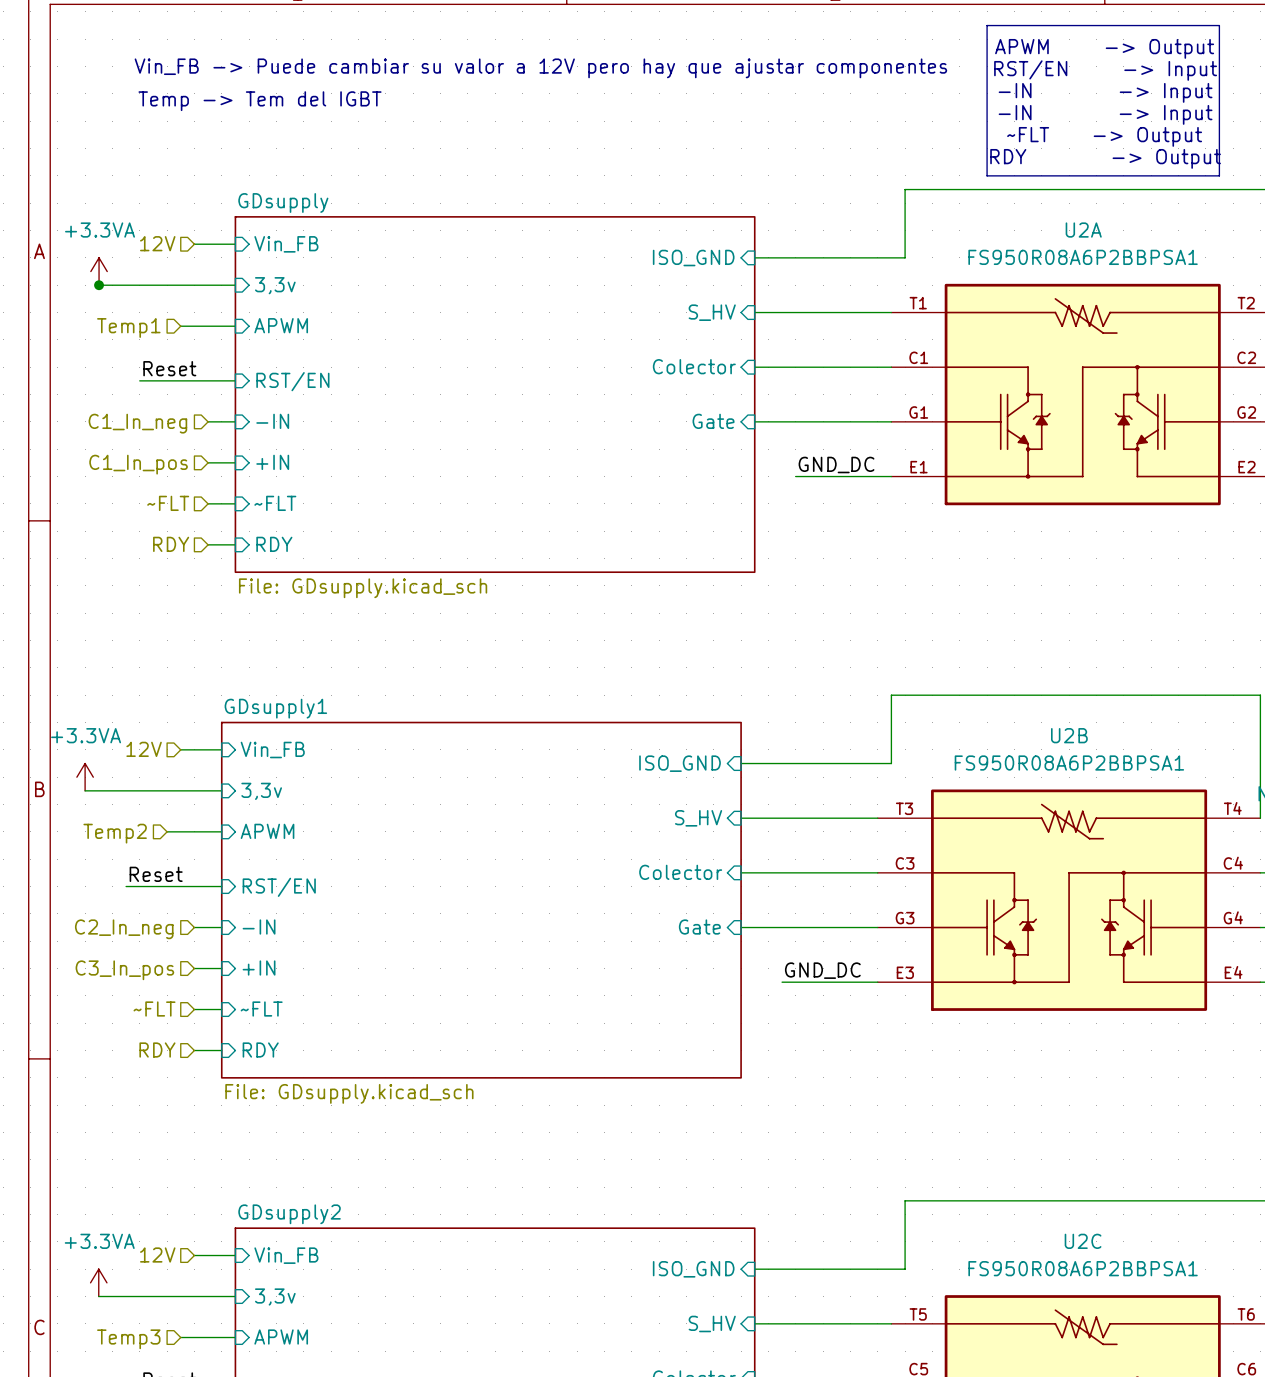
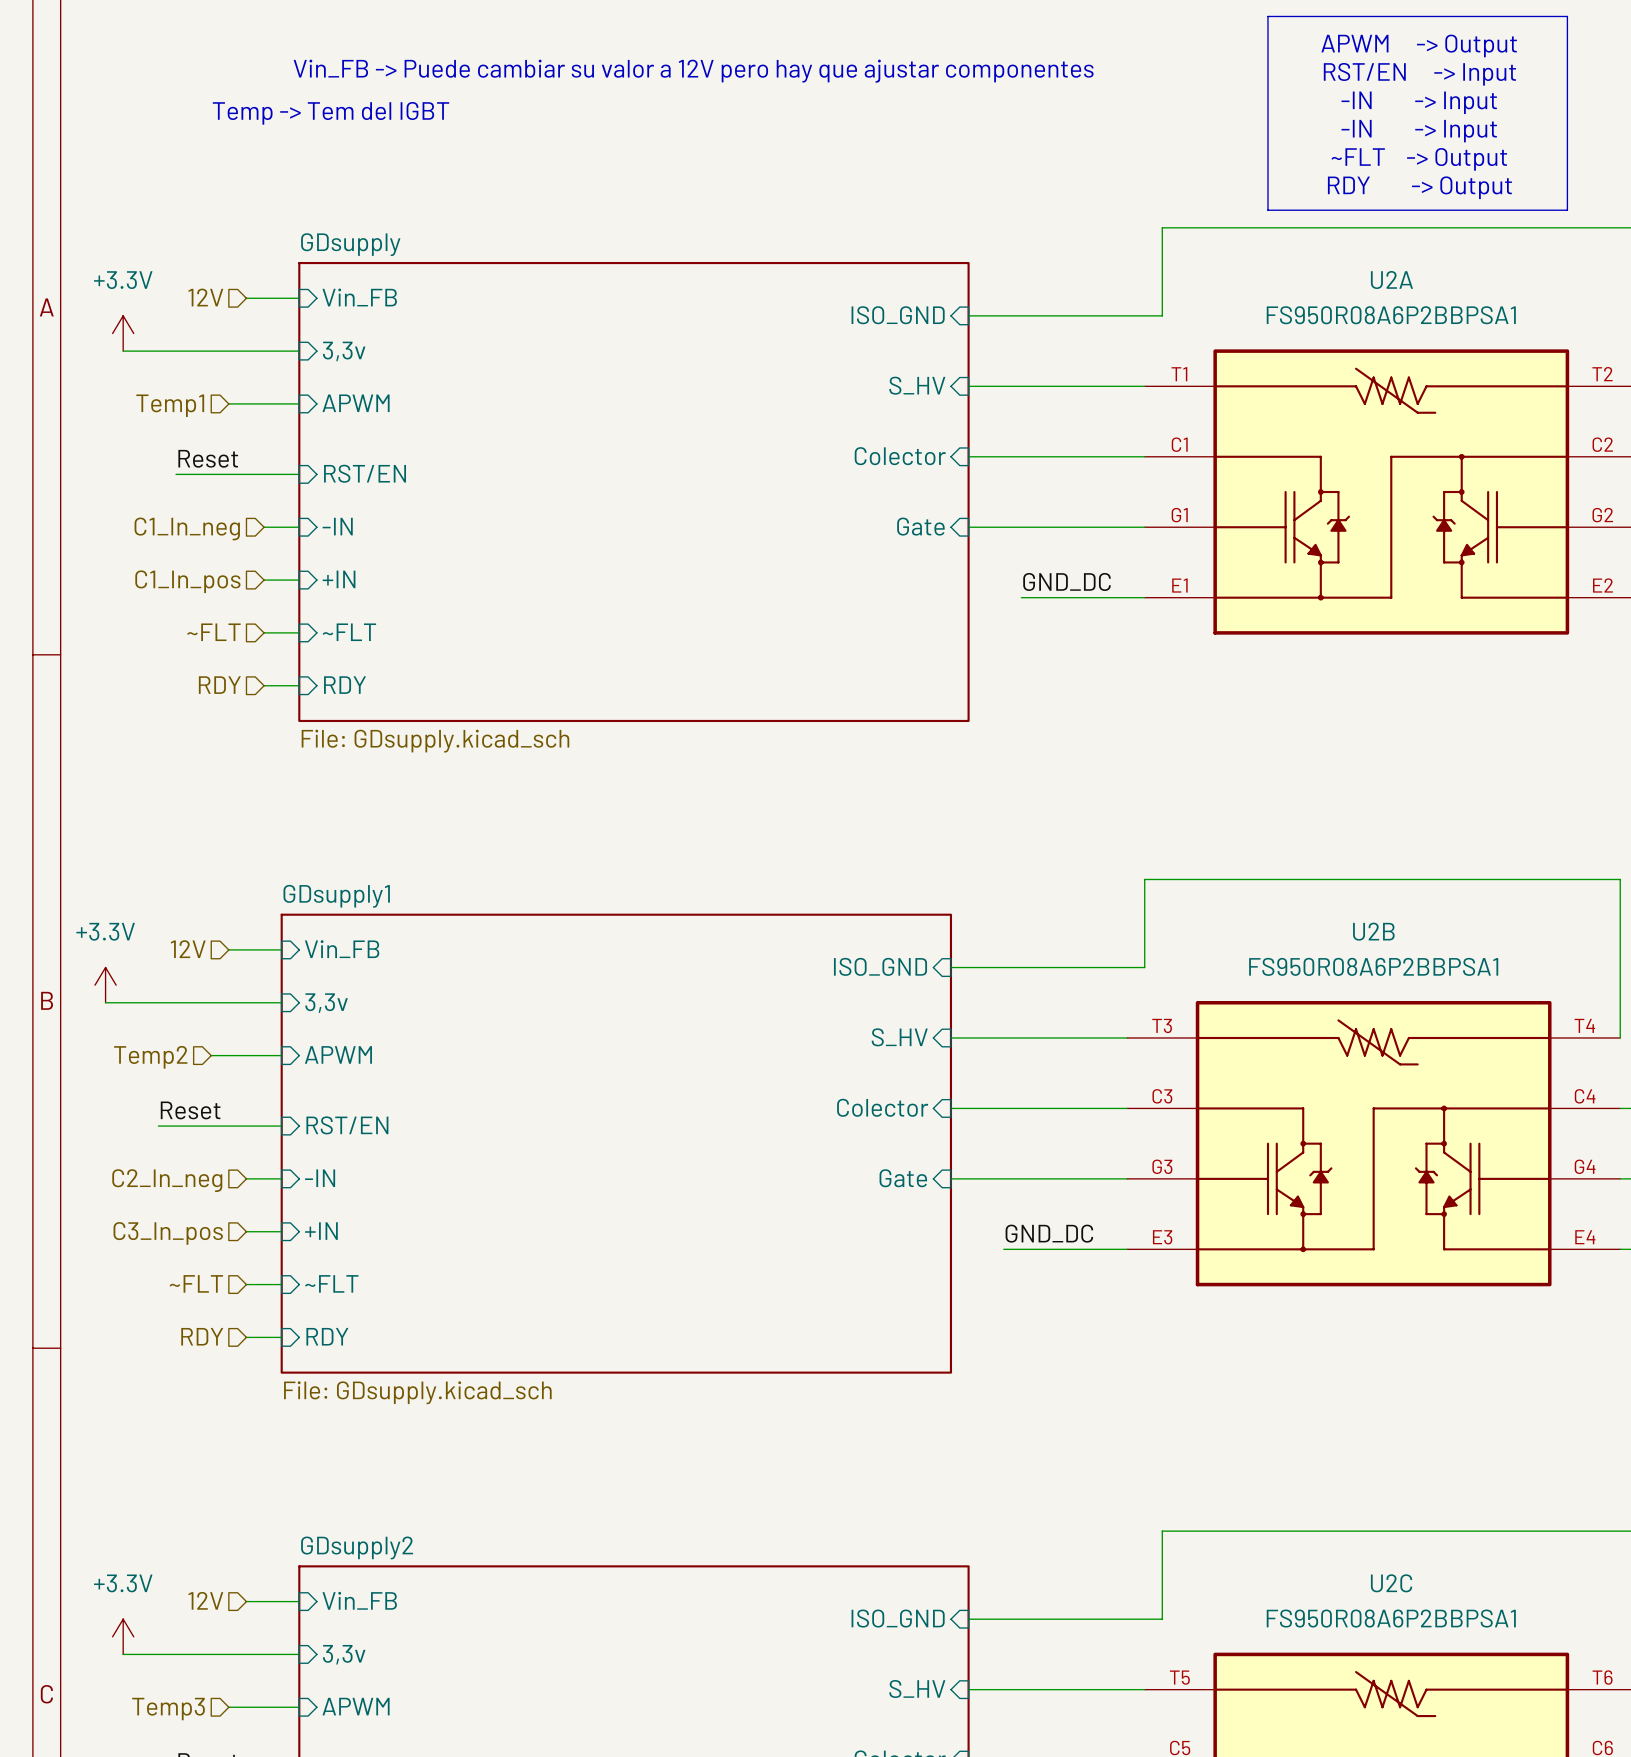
power symbol: +3.3VA (99, 271) -> +3.3V (123, 333)
junction: (99, 285) -> none
power symbol: +3.3VA (85, 777) -> +3.3V (105, 985)
power symbol: +3.3VA (98, 1282) -> +3.3V (123, 1636)

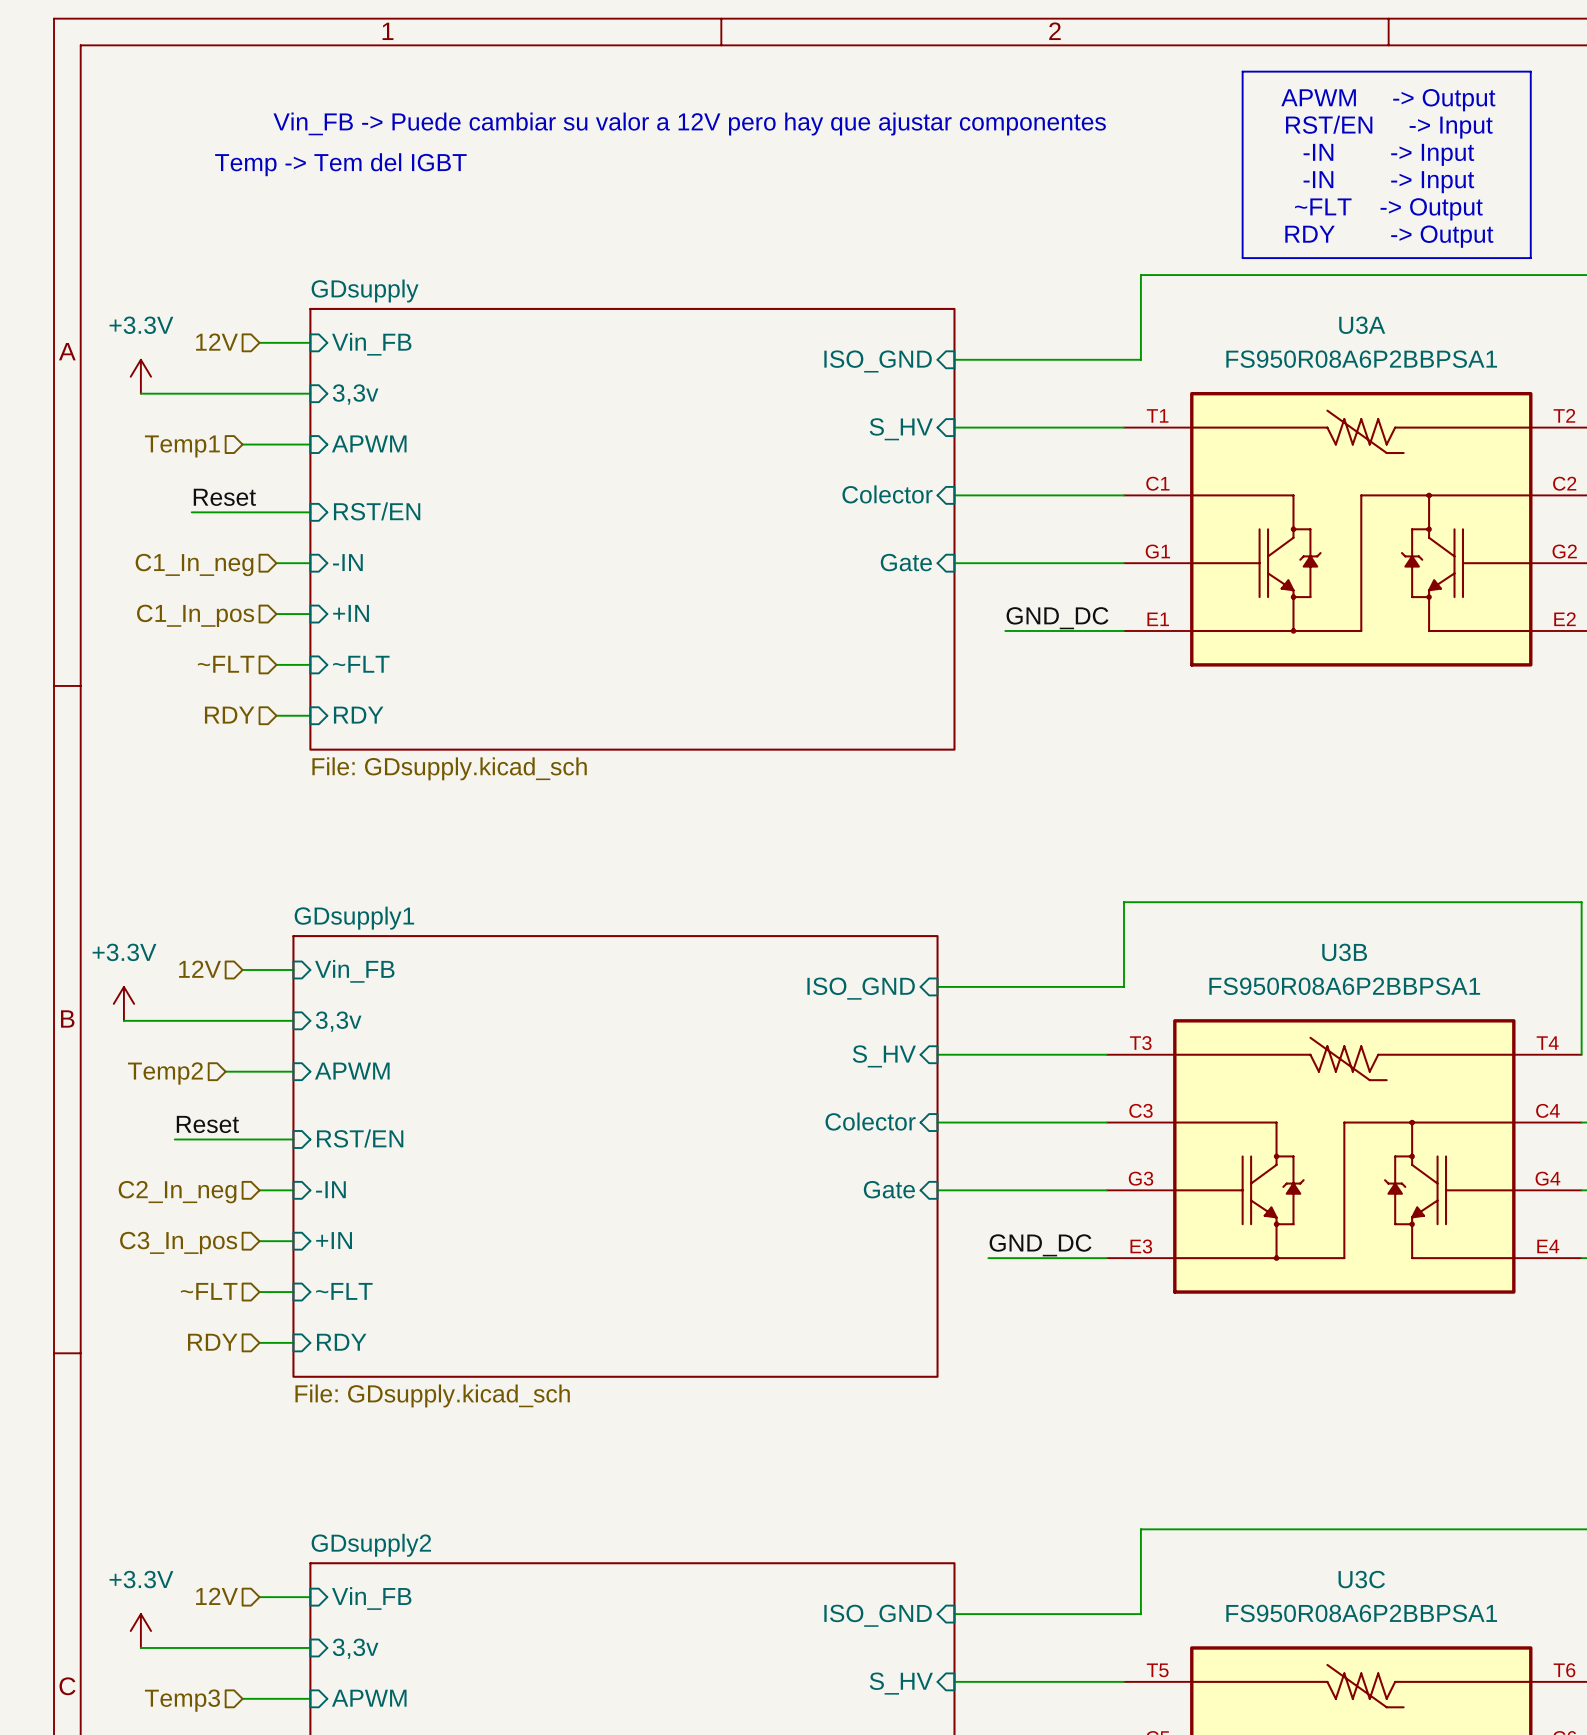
U2A name: U2A (1391, 280) -> U3A (1362, 325)
U2B name: U2B (1373, 931) -> U3B (1344, 952)
U2C name: U2C (1391, 1583) -> U3C (1361, 1579)

